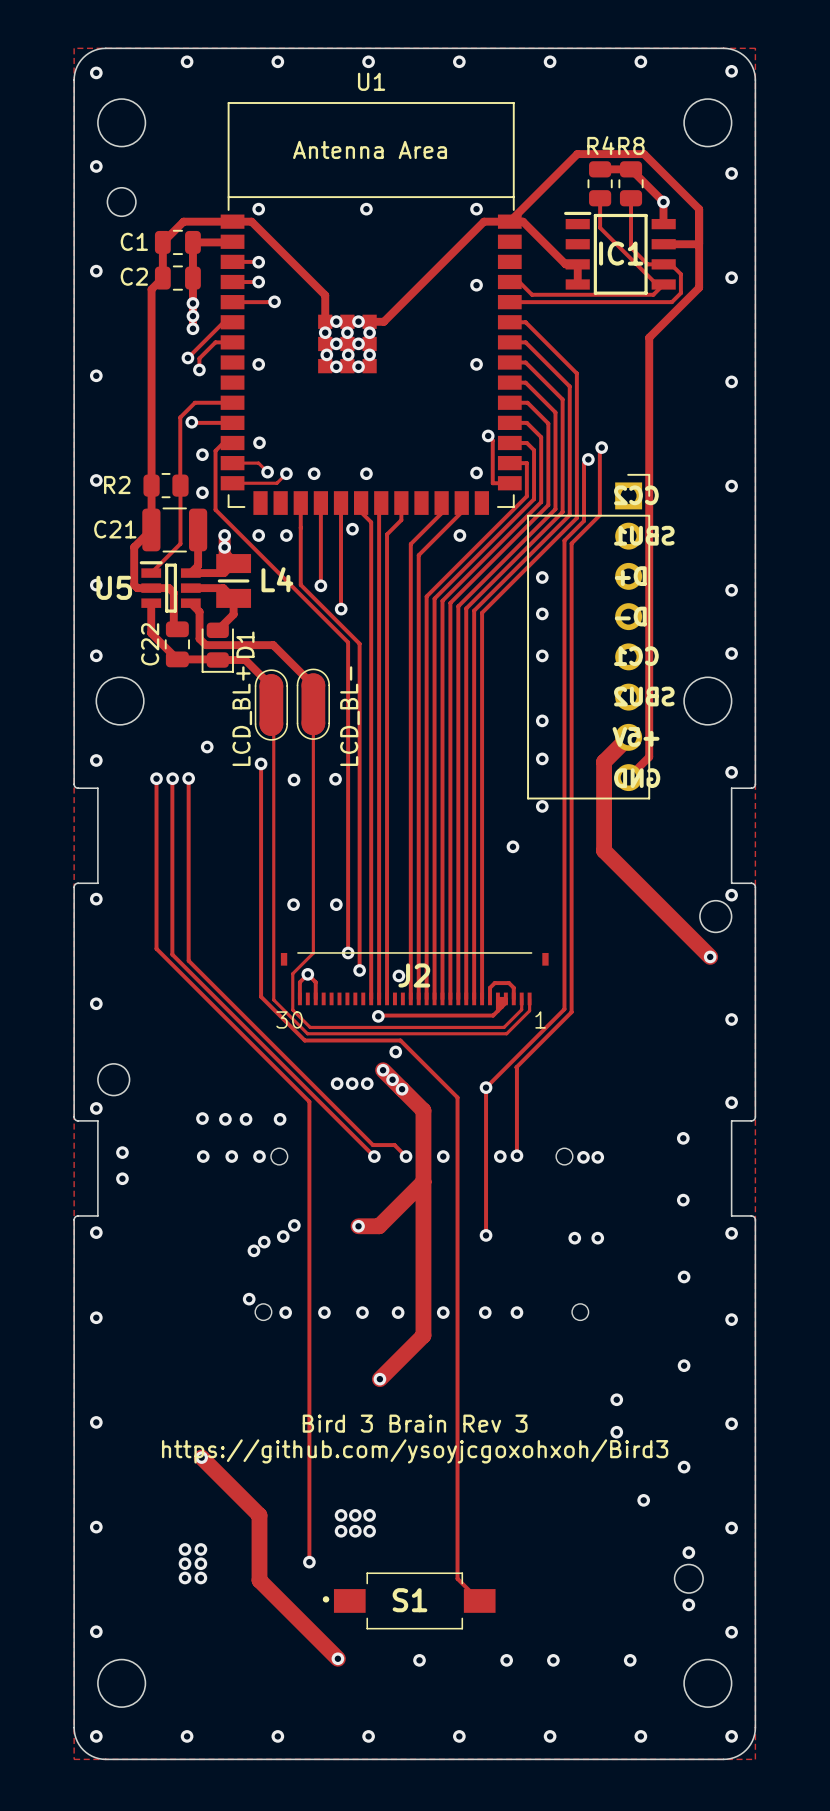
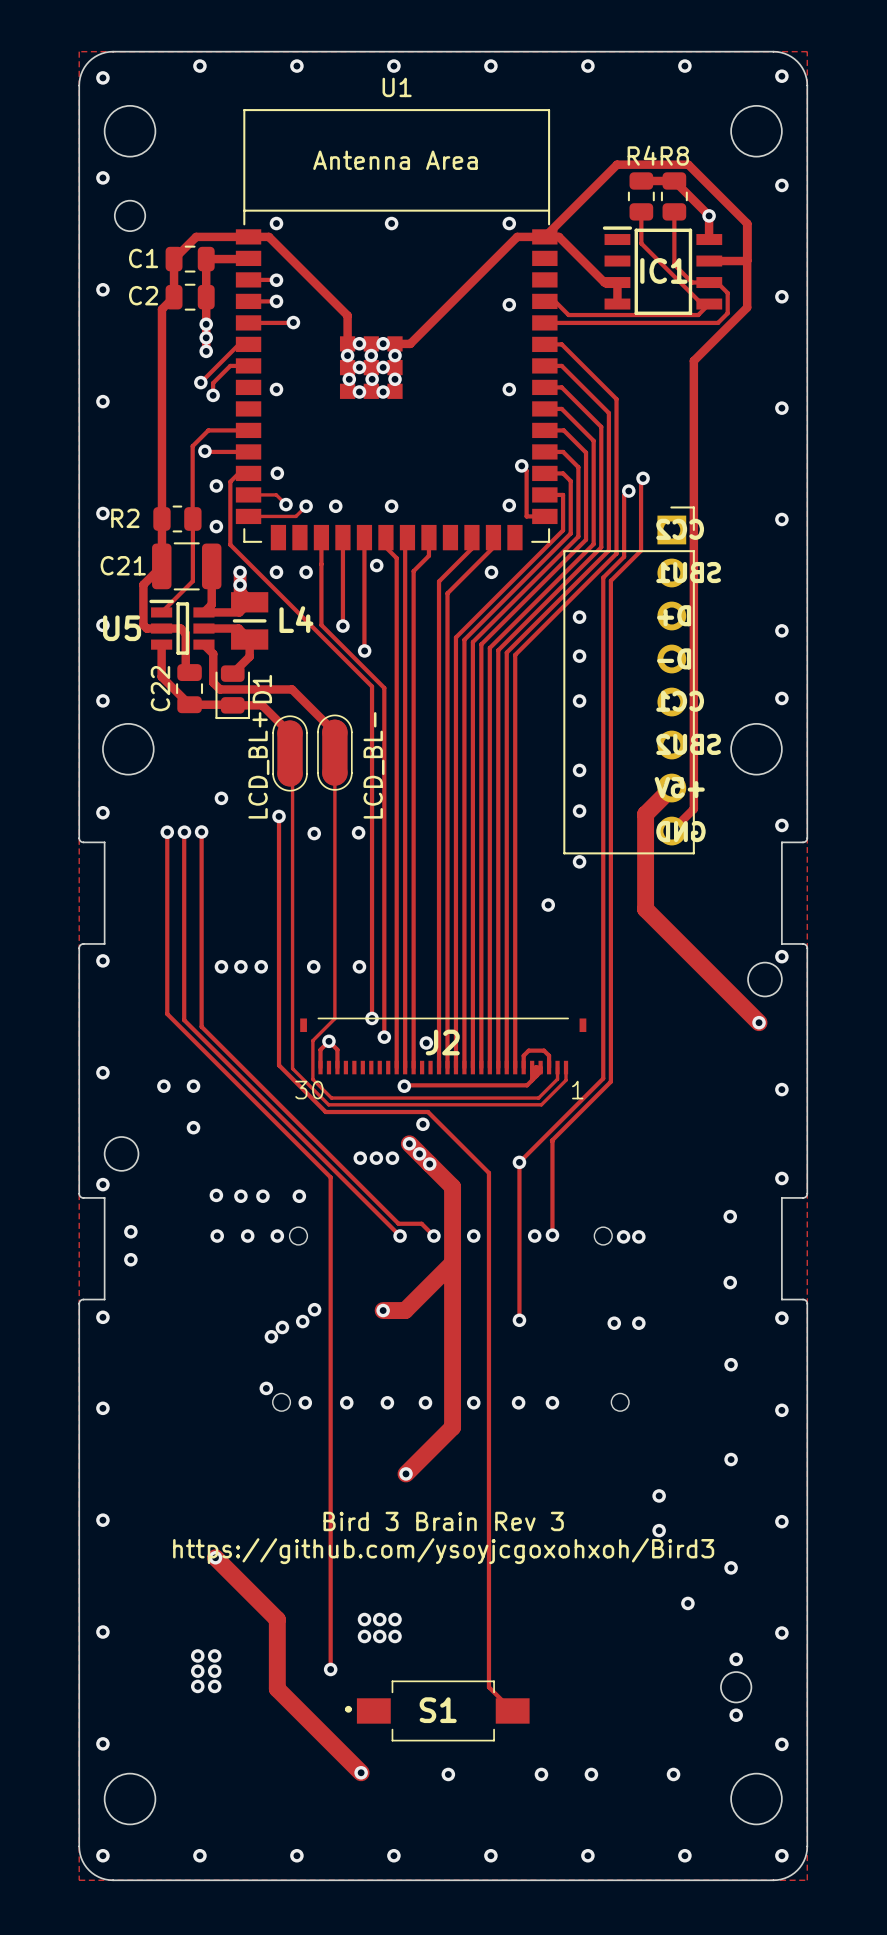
via: none -> (221, 966)
via: none -> (240, 966)
via: none -> (261, 966)
via: none -> (163, 1086)
via: none -> (193, 1086)
via: none -> (193, 1127)

